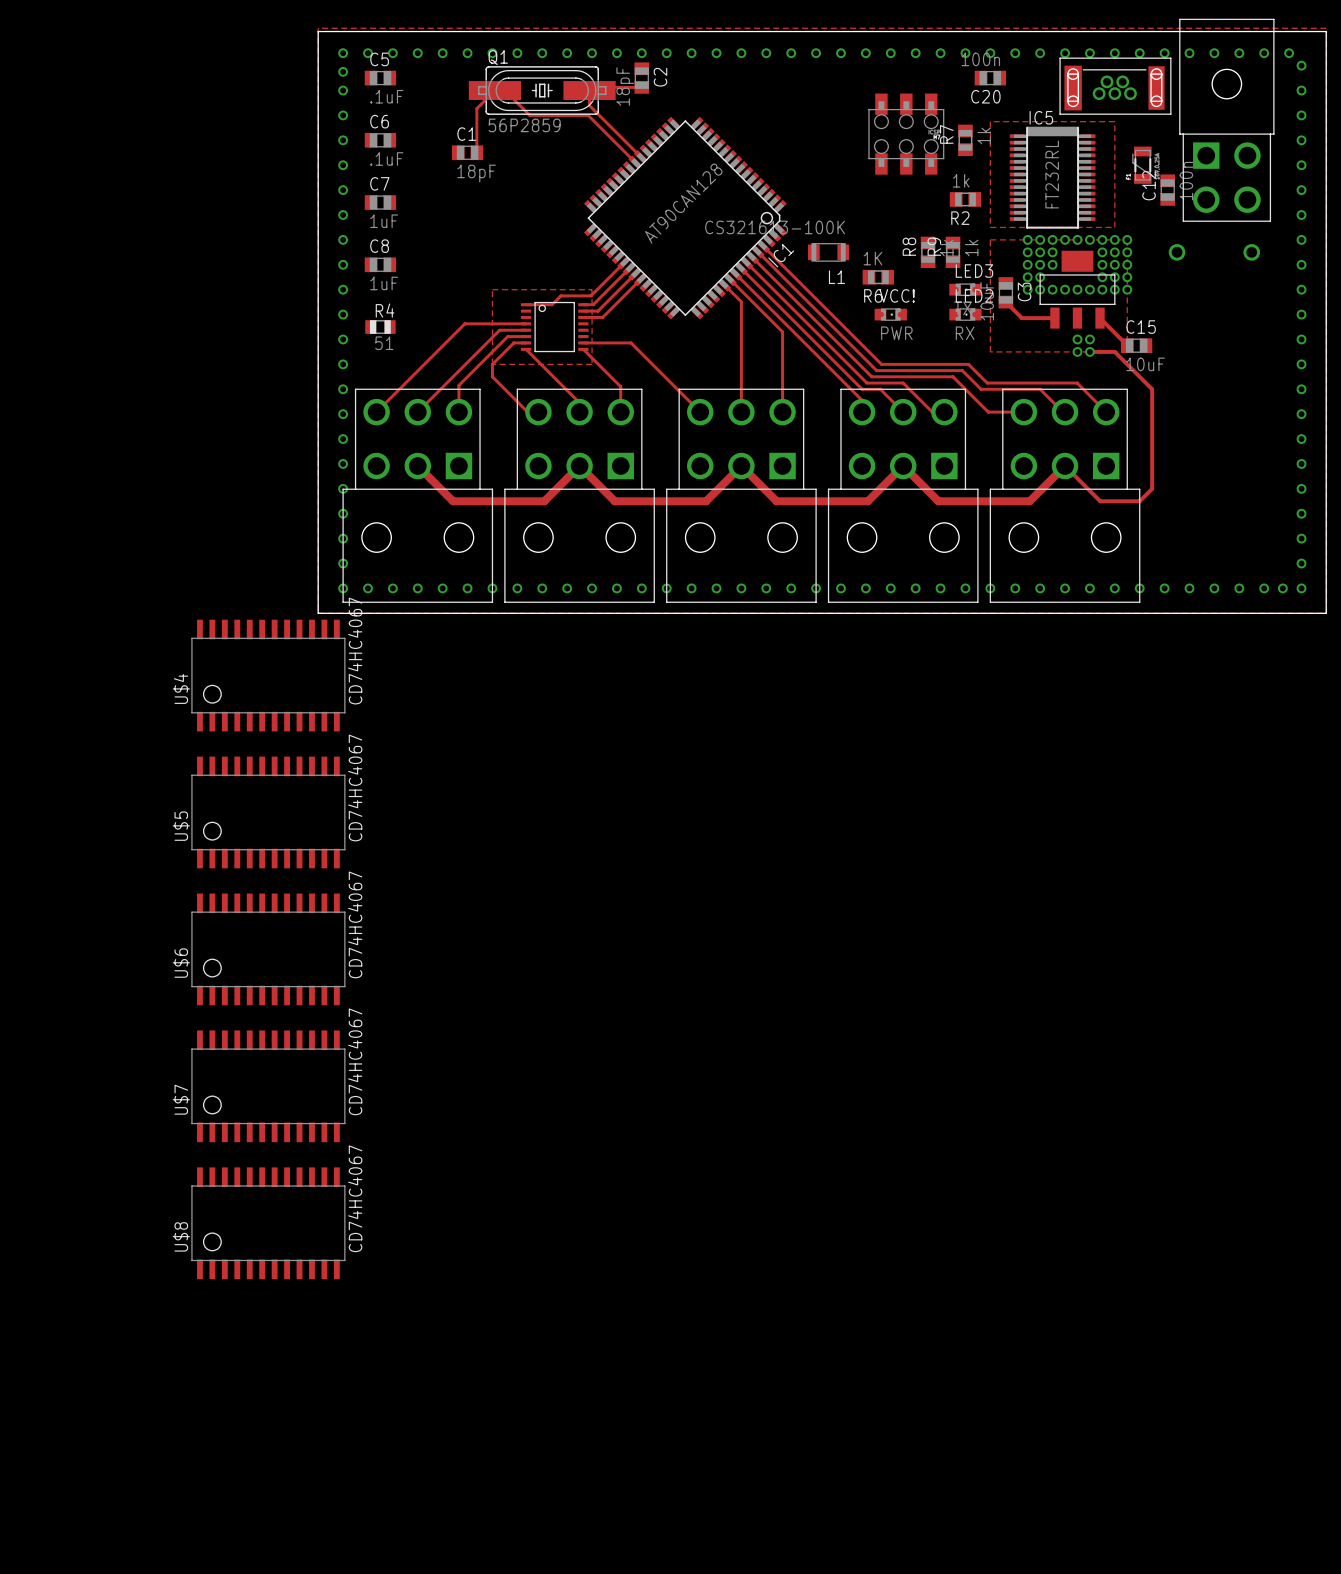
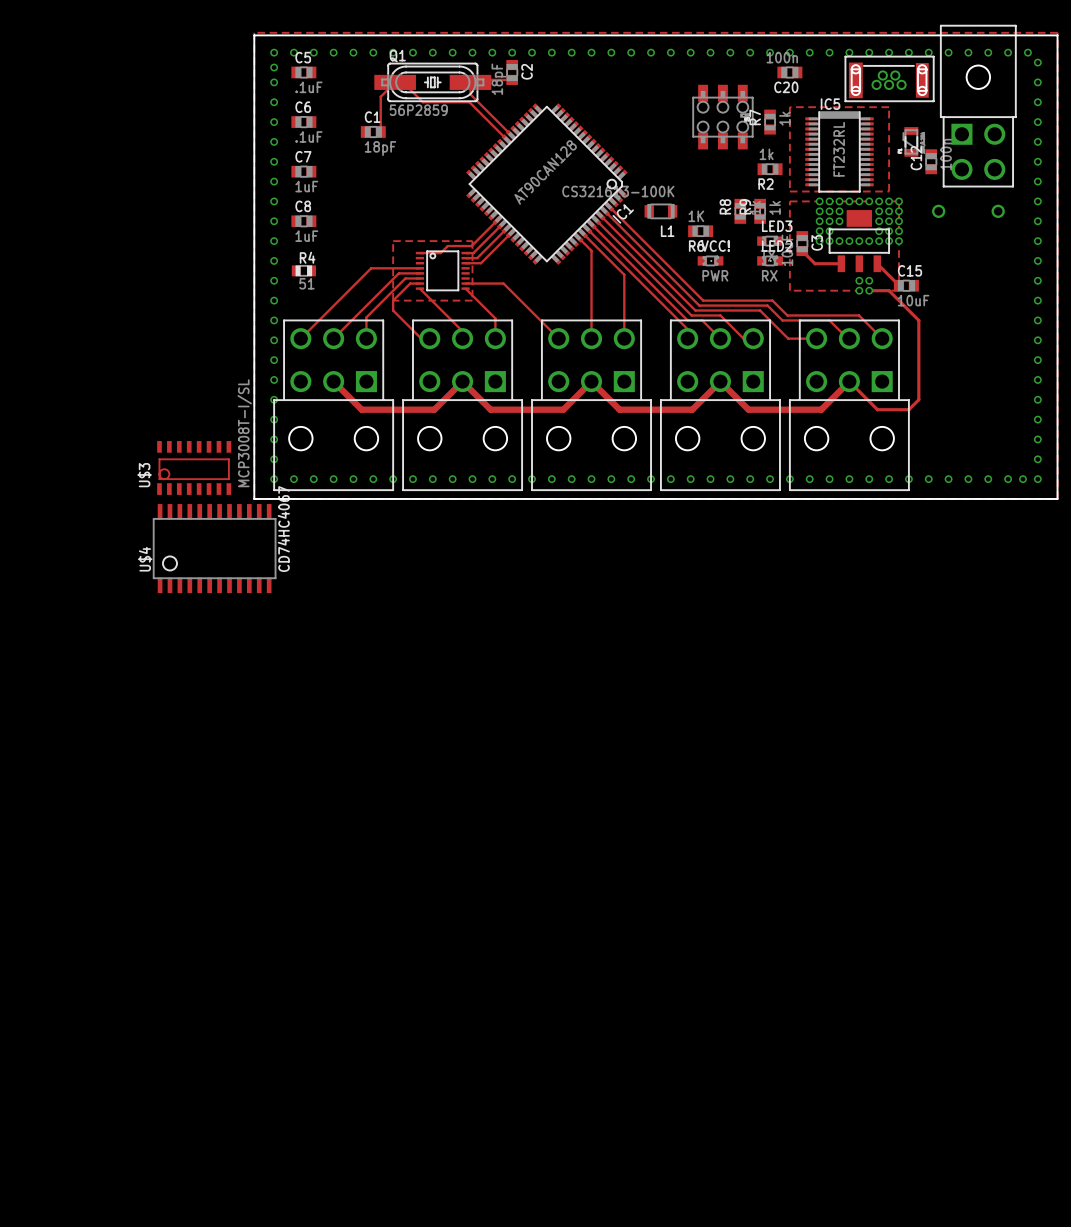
U$3: none -> MCP3008T-I/SL (194, 467)
U$5: CD74HC4067 (268, 812) -> none
U$6: CD74HC4067 (268, 949) -> none
U$7: CD74HC4067 (268, 1086) -> none
U$8: CD74HC4067 (268, 1223) -> none

